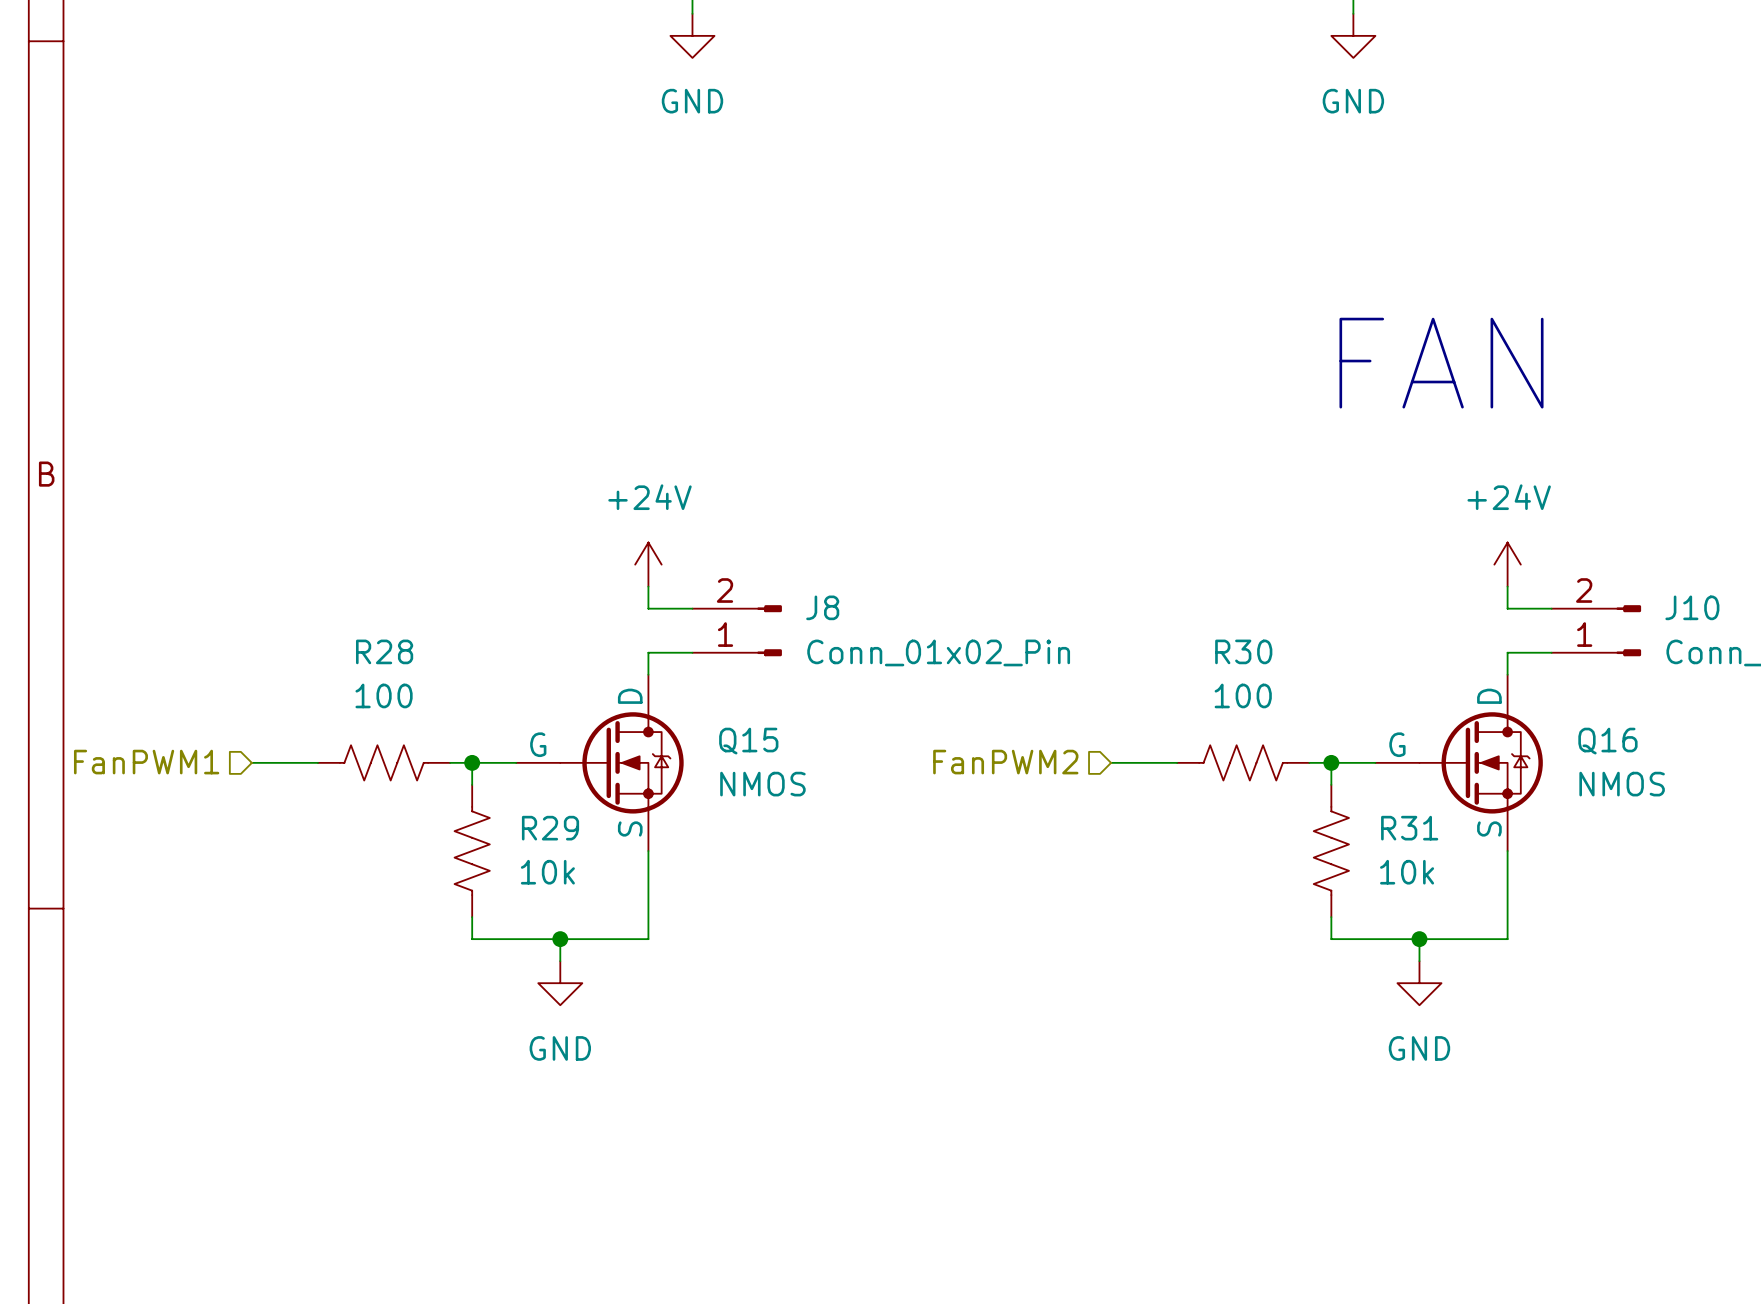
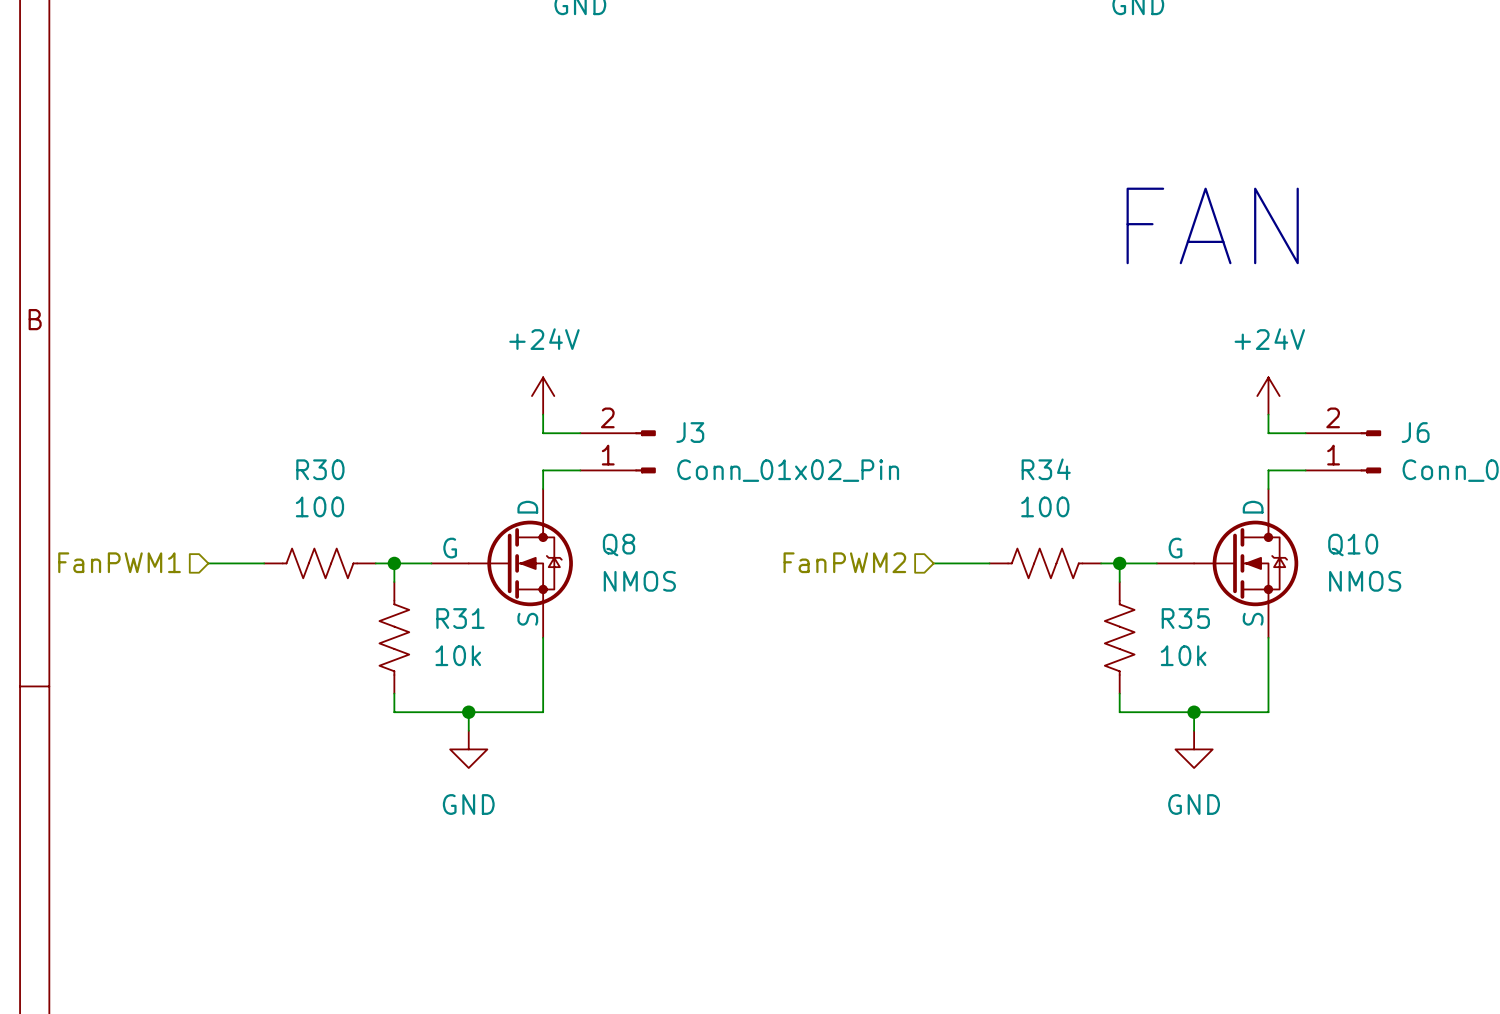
J8 name: J8 (822, 607) -> J3 (690, 432)
J10 name: J10 (1692, 607) -> J6 (1415, 432)
R28 name: R28 (384, 651) -> R30 (320, 469)
R30 name: R30 (1243, 651) -> R34 (1046, 469)
Q15 name: Q15 (748, 741) -> Q8 (619, 545)
Q16 name: Q16 (1607, 741) -> Q10 (1353, 545)
R29 name: R29 (550, 828) -> R31 (460, 618)
R31 name: R31 (1409, 828) -> R35 (1185, 618)

